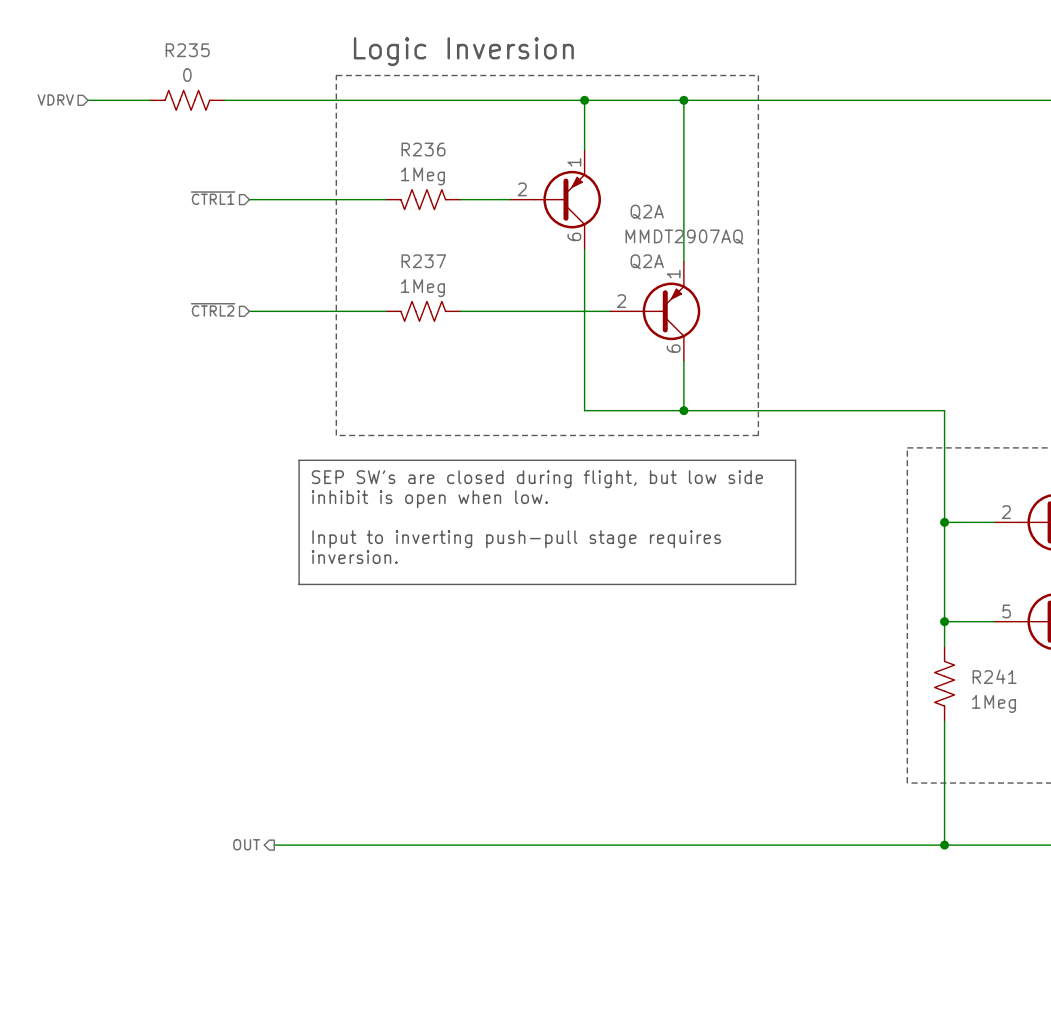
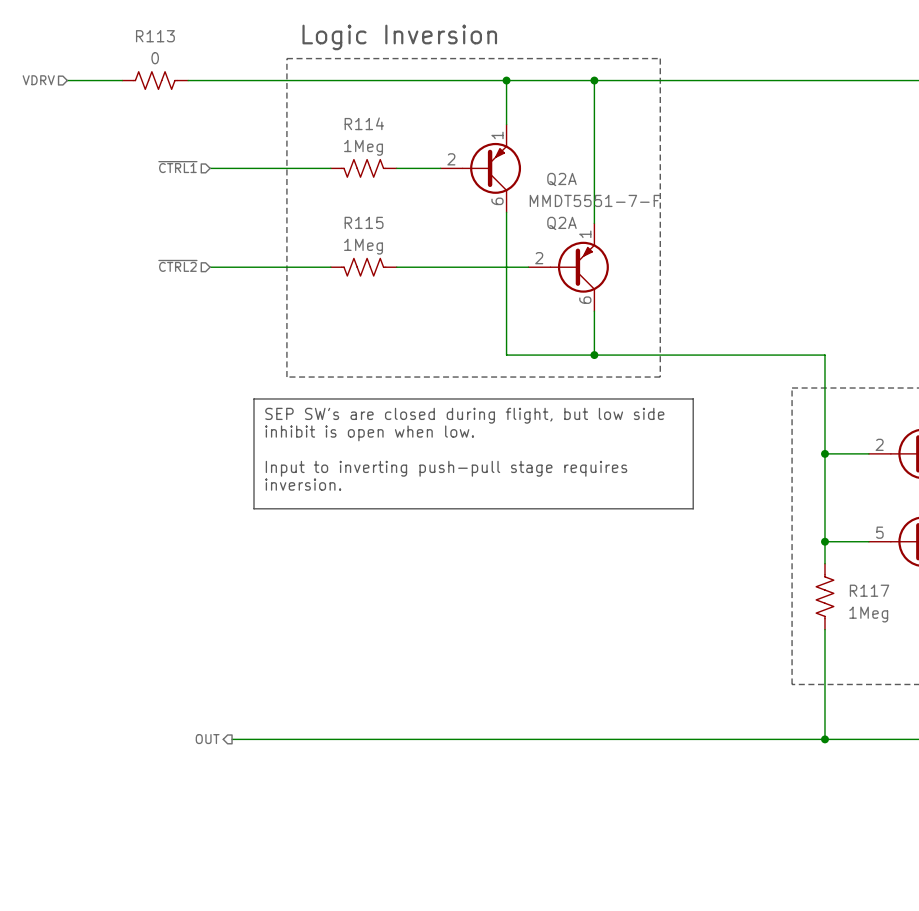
R235 name: R235 (187, 50) -> R113 (155, 36)
R236 name: R236 (423, 149) -> R114 (364, 123)
Q2A value: MMDT2907AQ (684, 237) -> MMDT5551-7-F (594, 200)
R237 name: R237 (423, 261) -> R115 (364, 222)
R241 name: R241 (994, 676) -> R117 (869, 590)

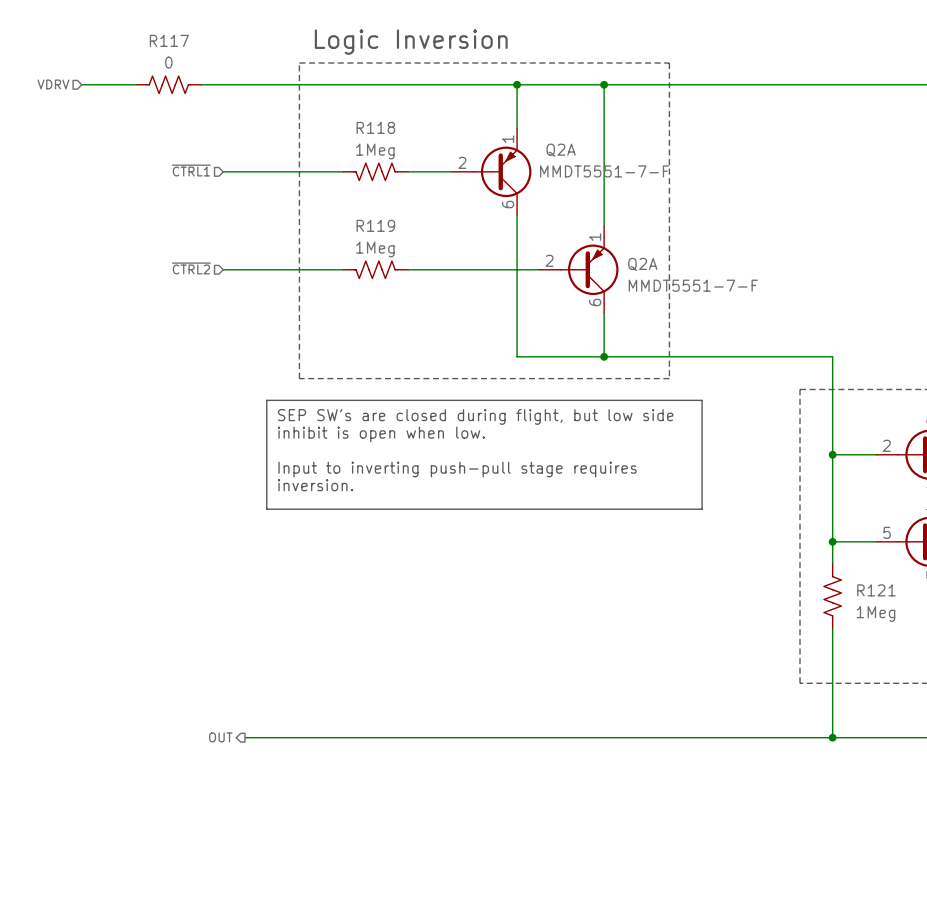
R113 name: R113 (155, 36) -> R117 (169, 40)
R114 name: R114 (364, 123) -> R118 (375, 127)
Q2A name position: Q2A (561, 179) -> Q2A (561, 150)
Q2A value position: MMDT5551-7-F (594, 200) -> MMDT5551-7-F (604, 171)
R115 name: R115 (364, 222) -> R119 (375, 225)
Q2A name position: Q2A (561, 223) -> Q2A (642, 264)
Q2A value: none -> MMDT5551-7-F (693, 285)
R117 name: R117 (869, 590) -> R121 (876, 590)

